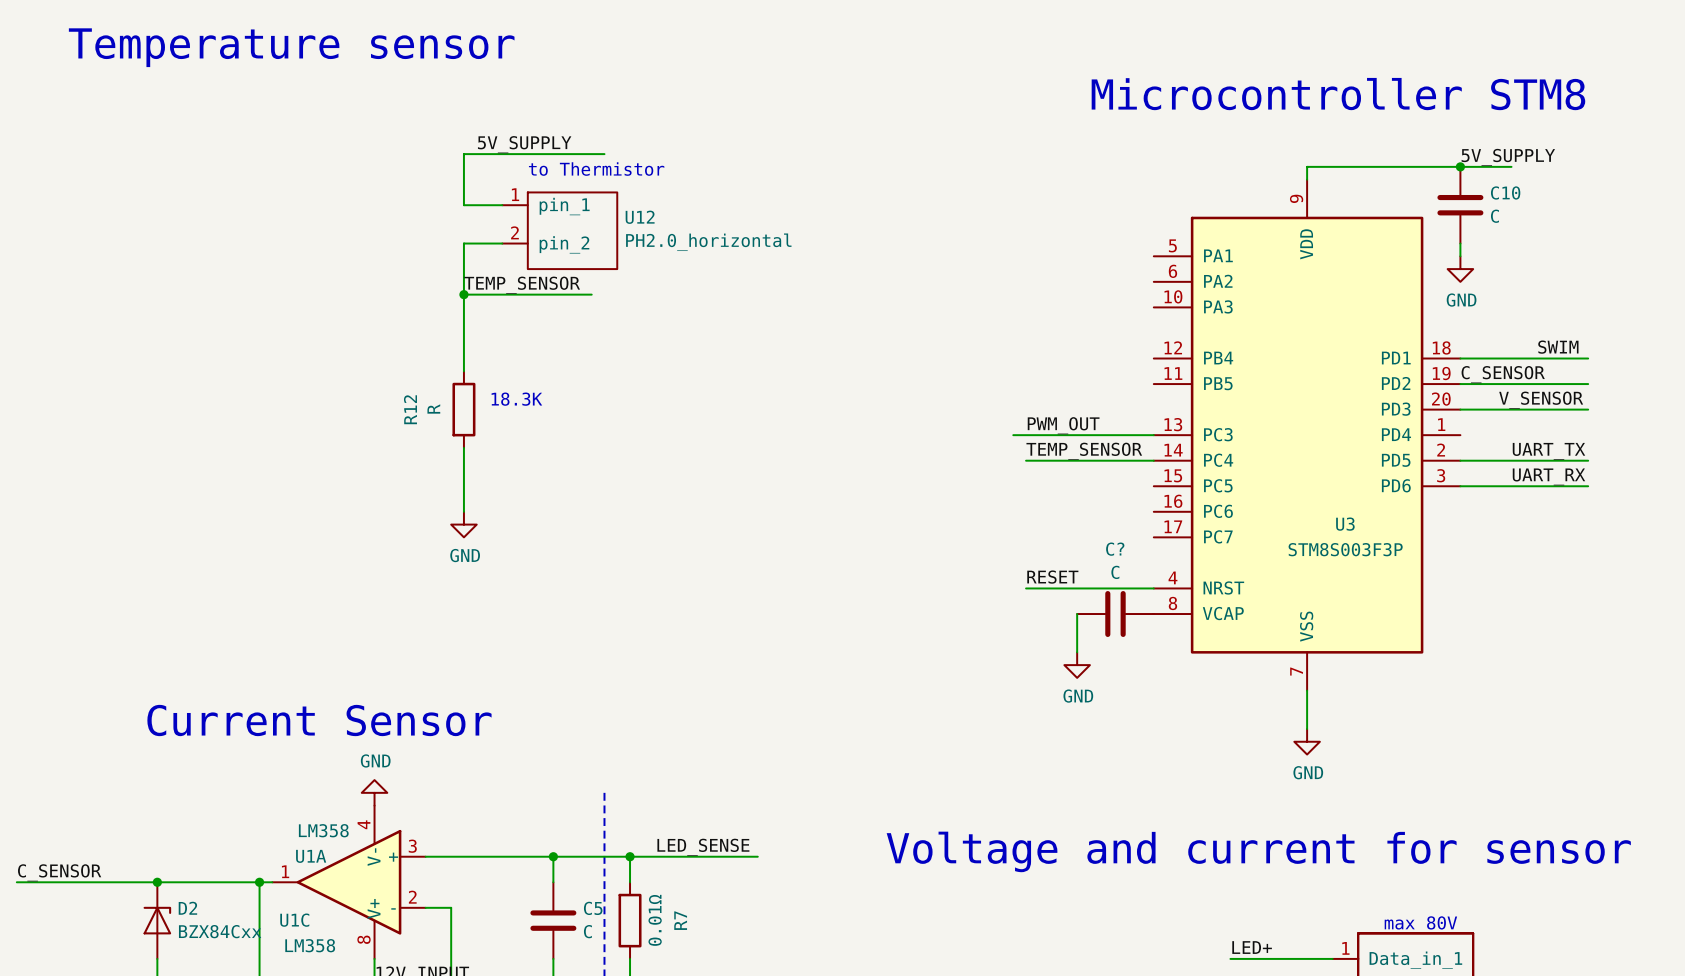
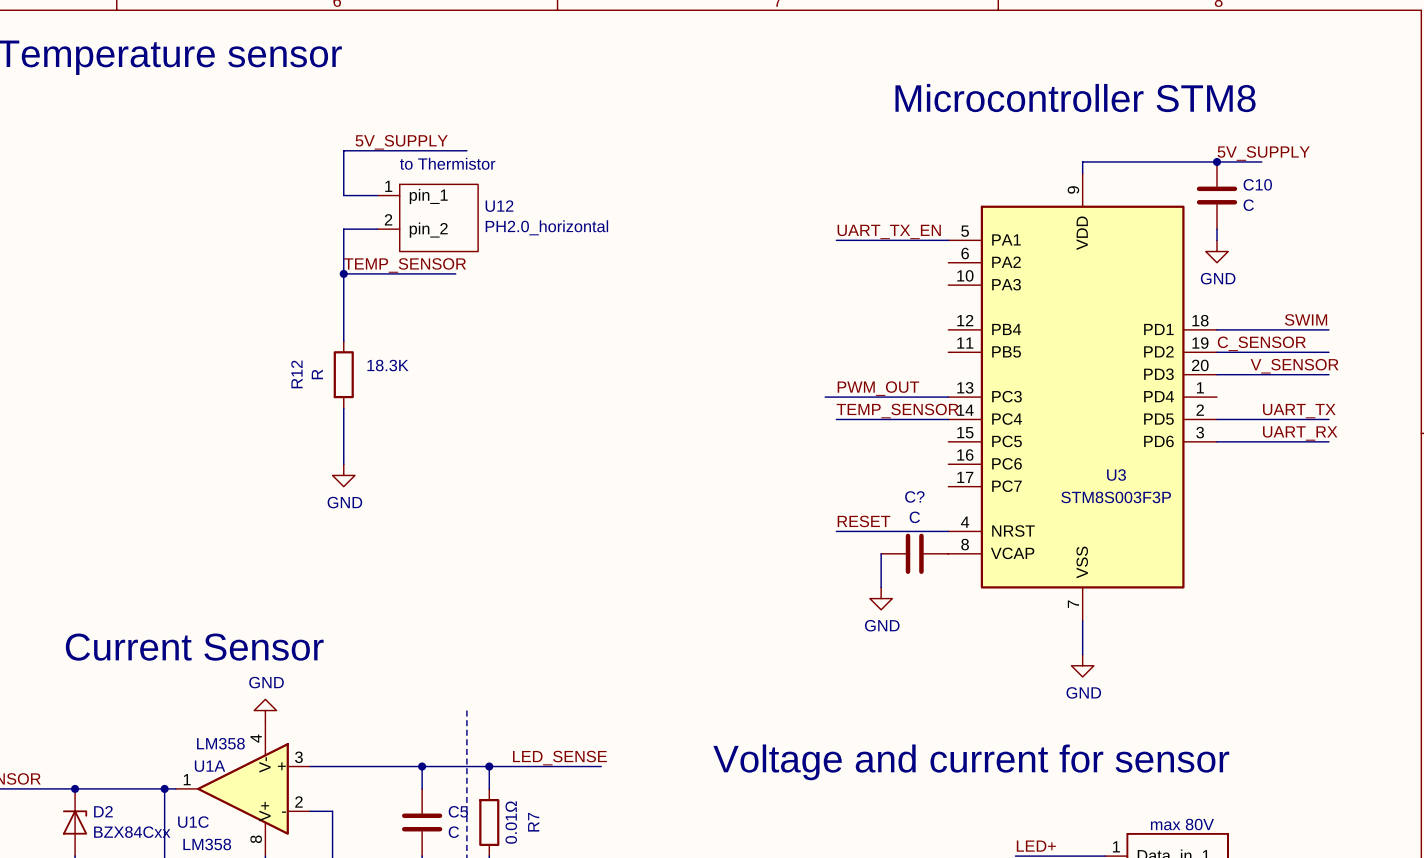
label: none -> UART_TX_EN (889, 231)
wire: none -> (836, 240) (948, 240)

